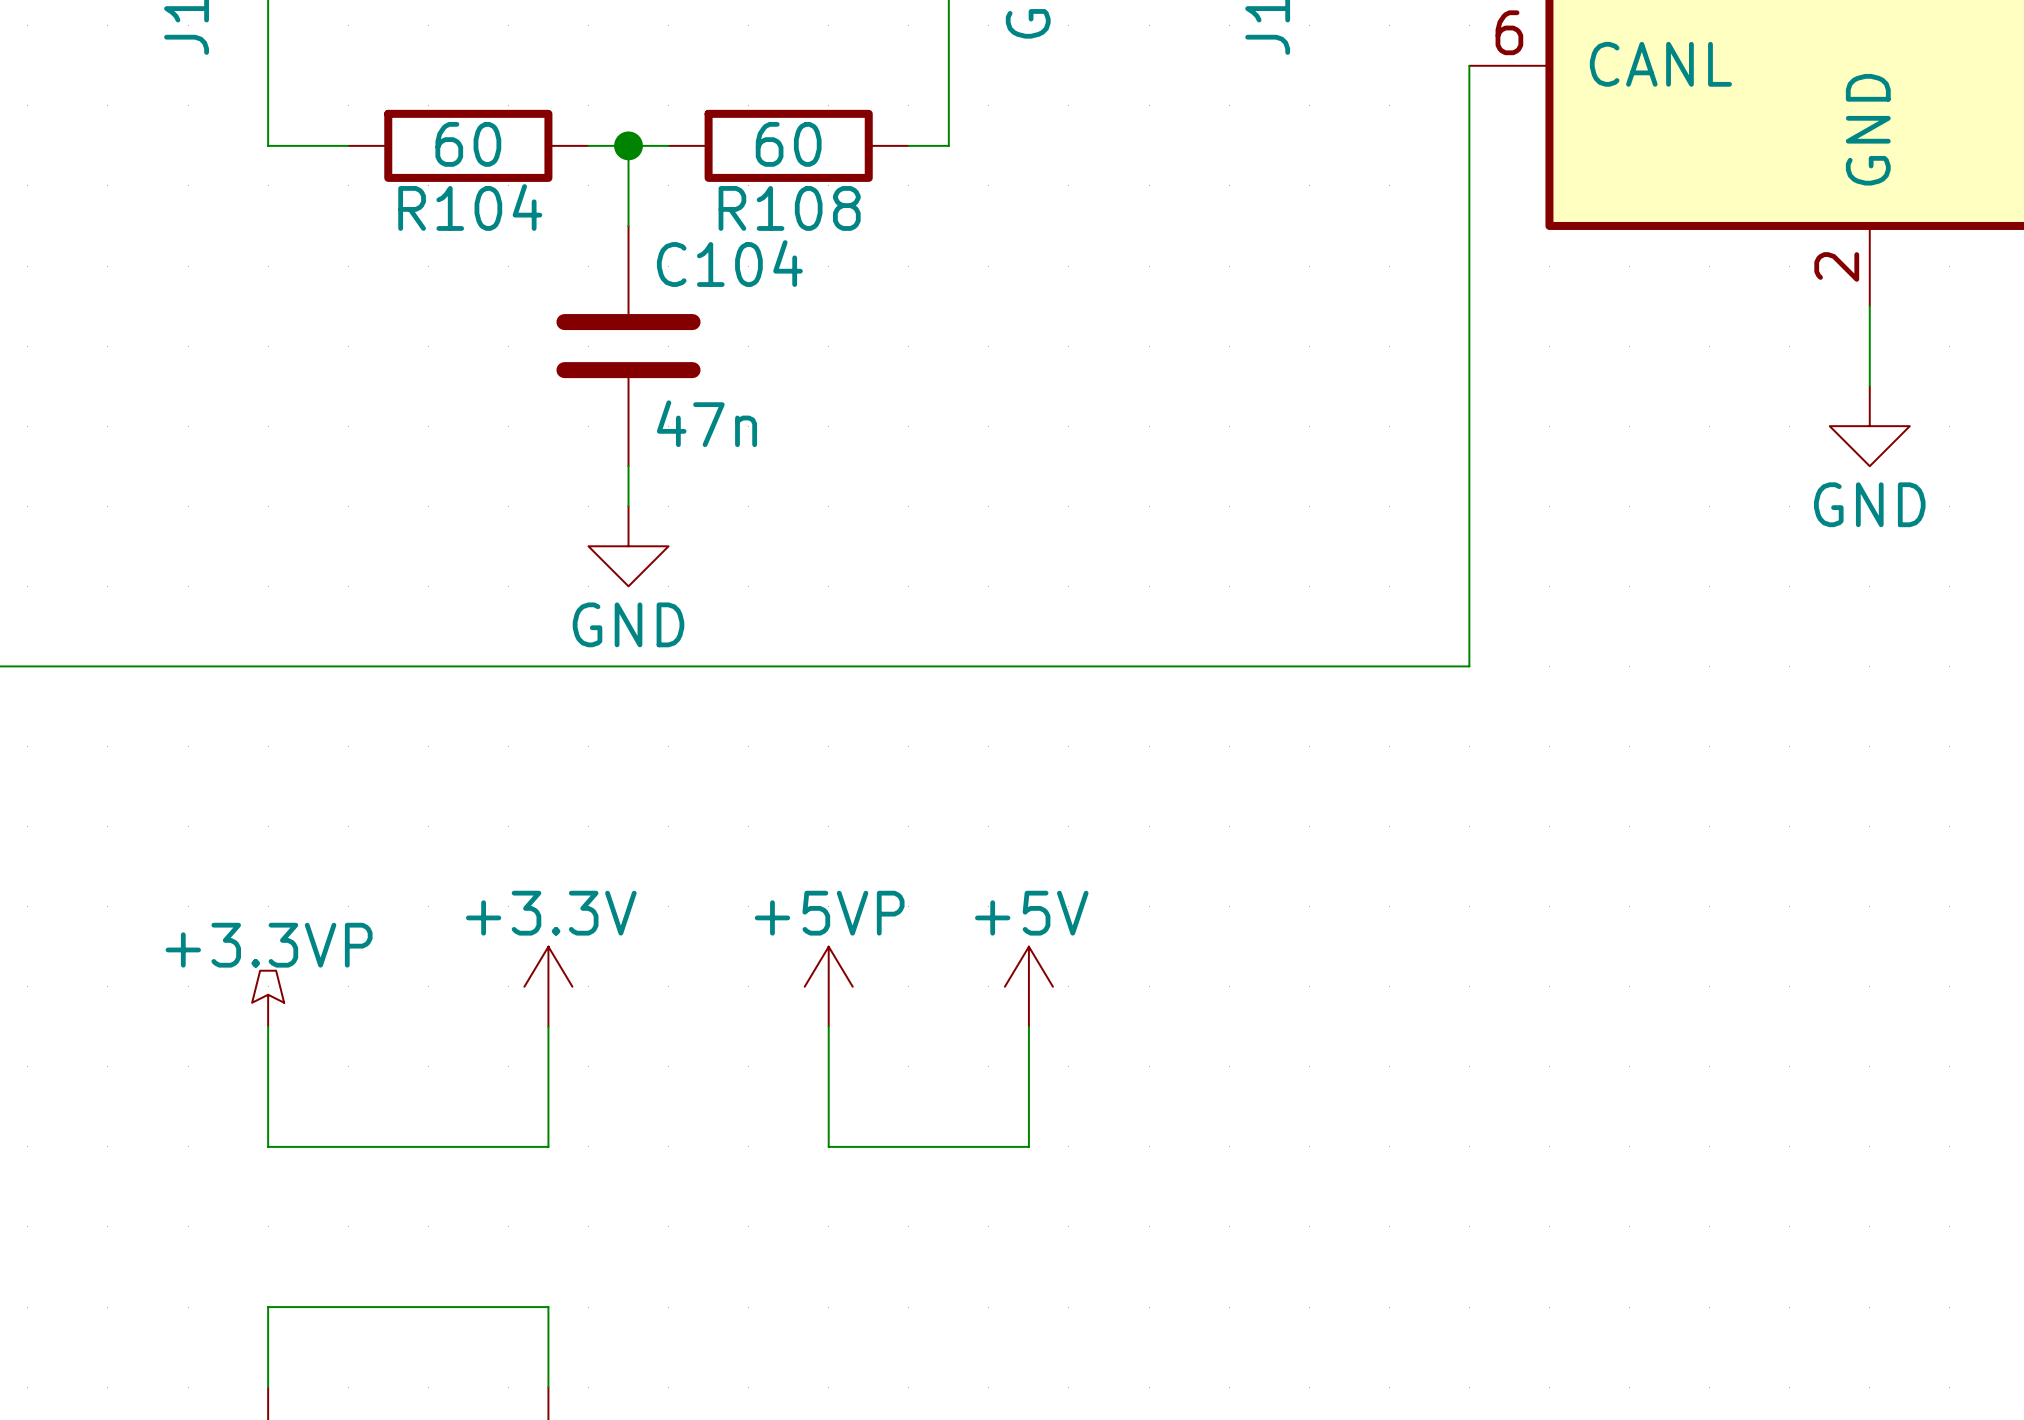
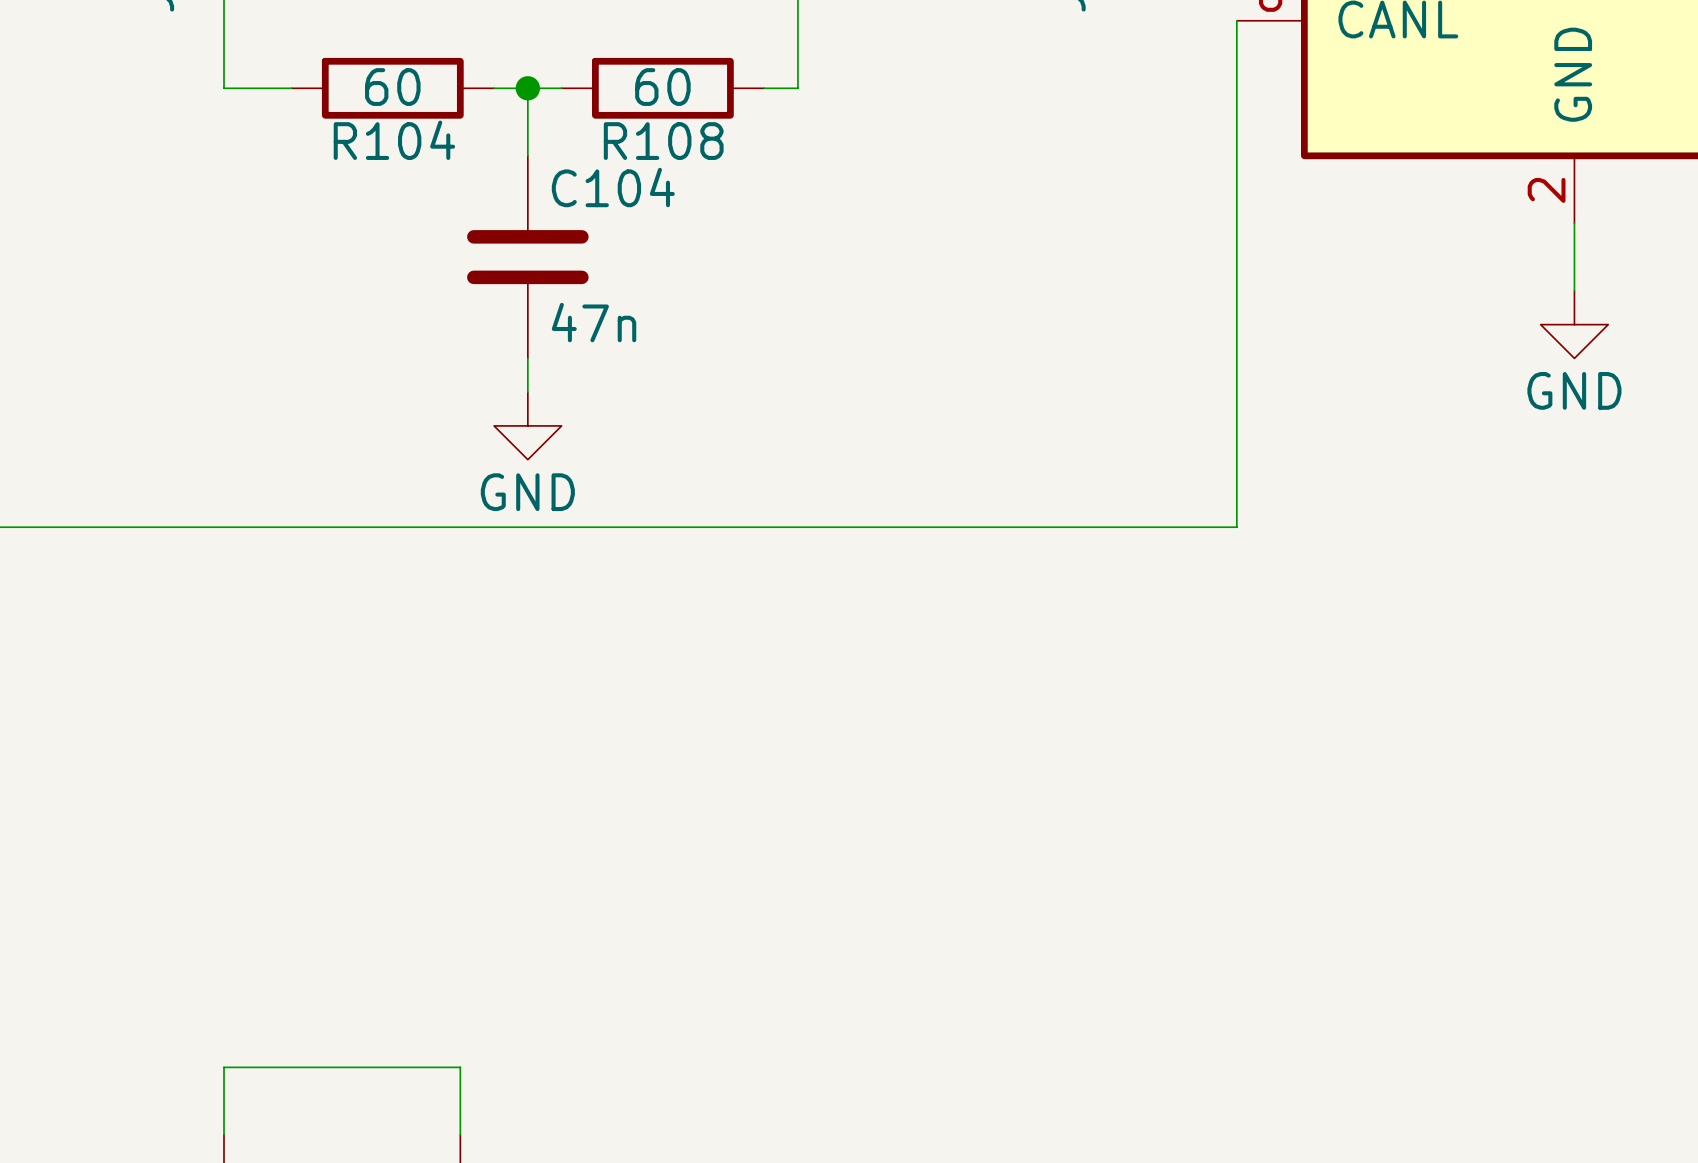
power symbol: +3.3V (548, 986) -> none
power symbol: +5VP (828, 986) -> none
power symbol: +5V (1028, 986) -> none
power symbol: +3.3VP (268, 998) -> none
wire: (268, 1026) (268, 1146) (548, 1146) (548, 1026) -> none
wire: (828, 1026) (828, 1146) (1028, 1146) (1028, 1026) -> none

